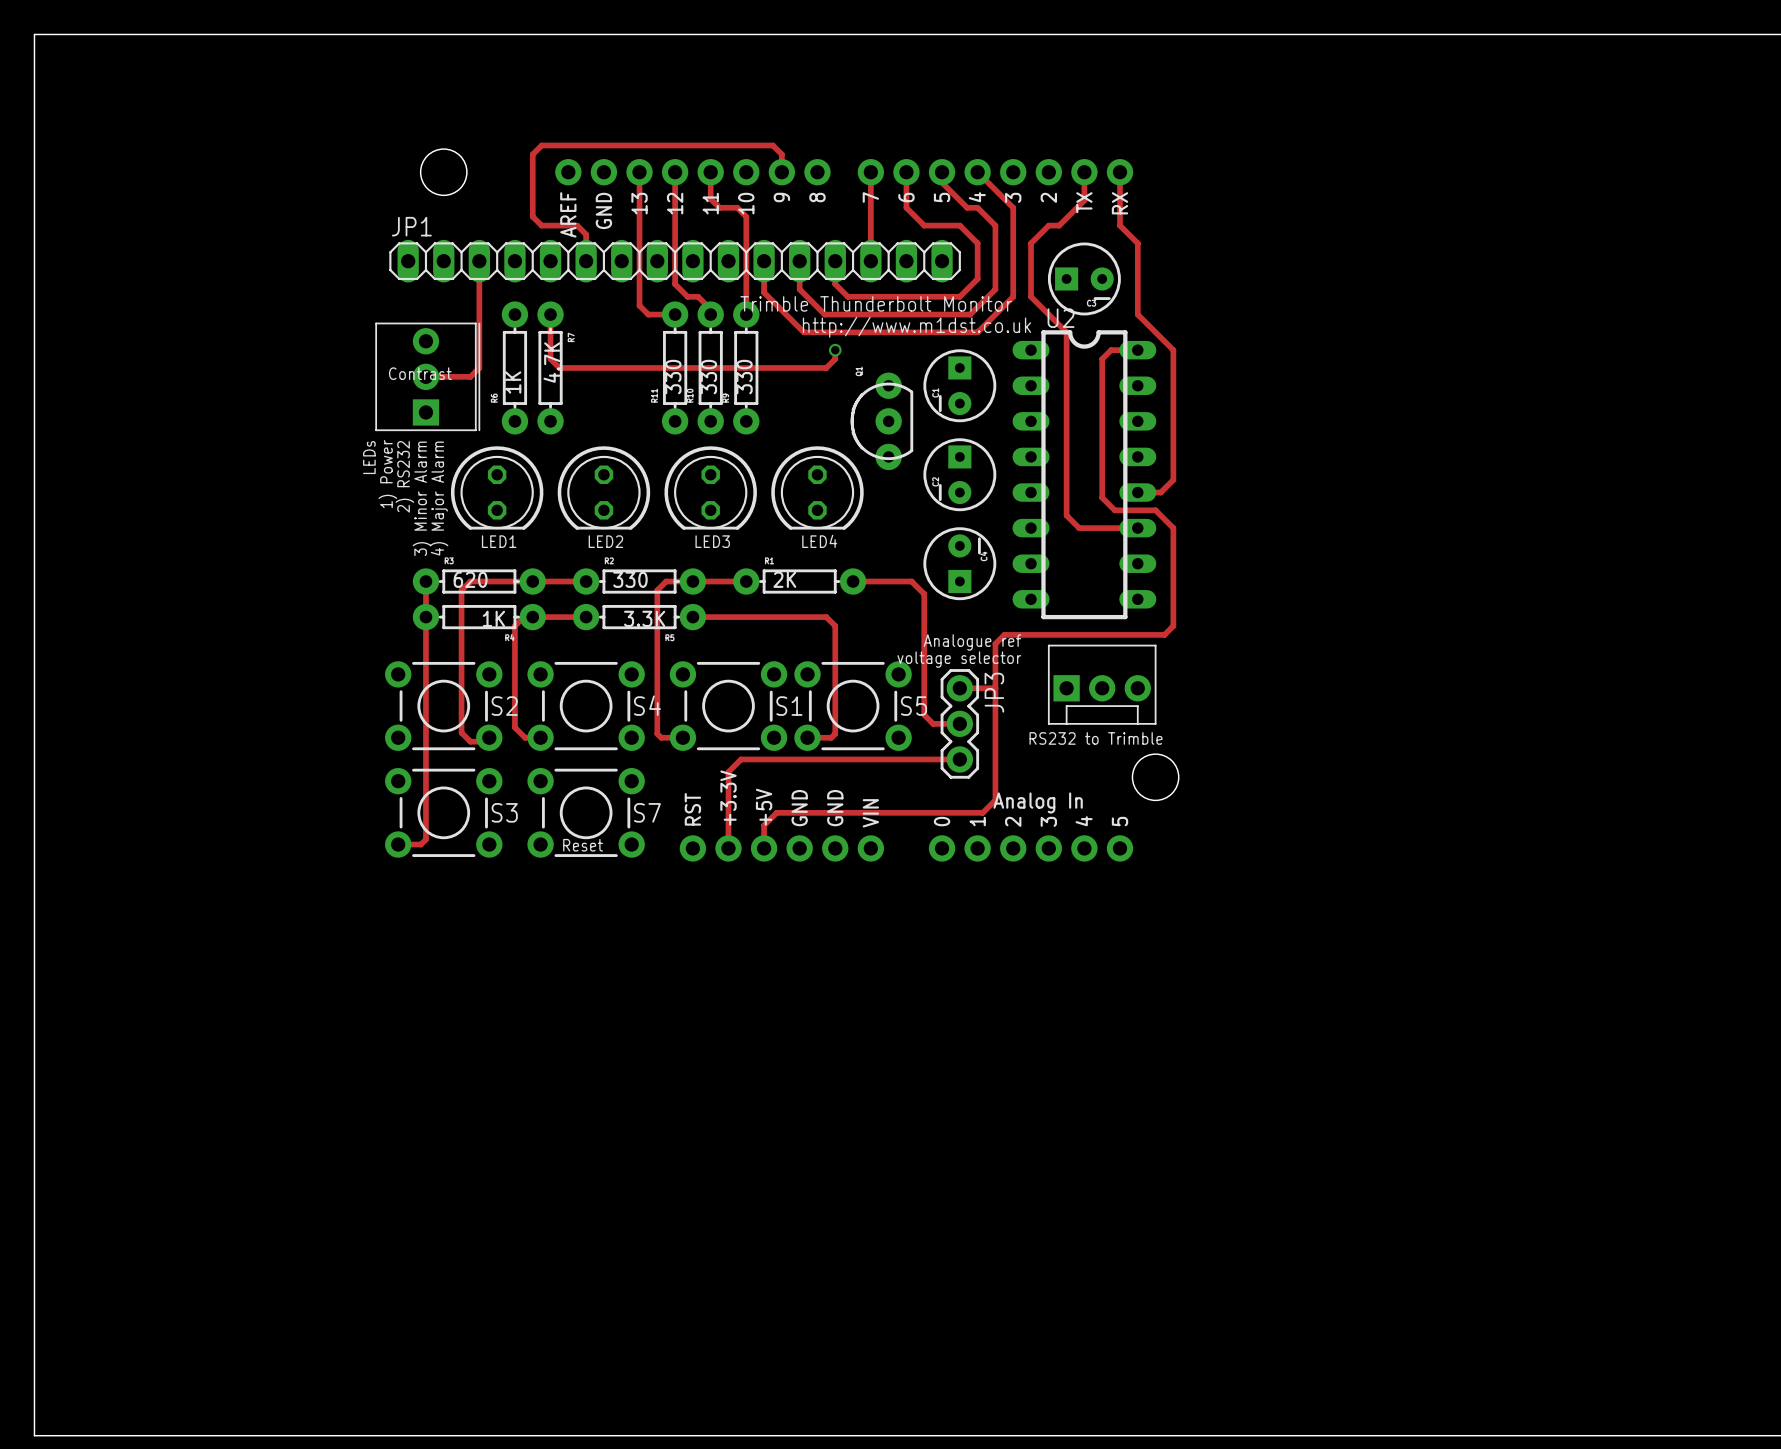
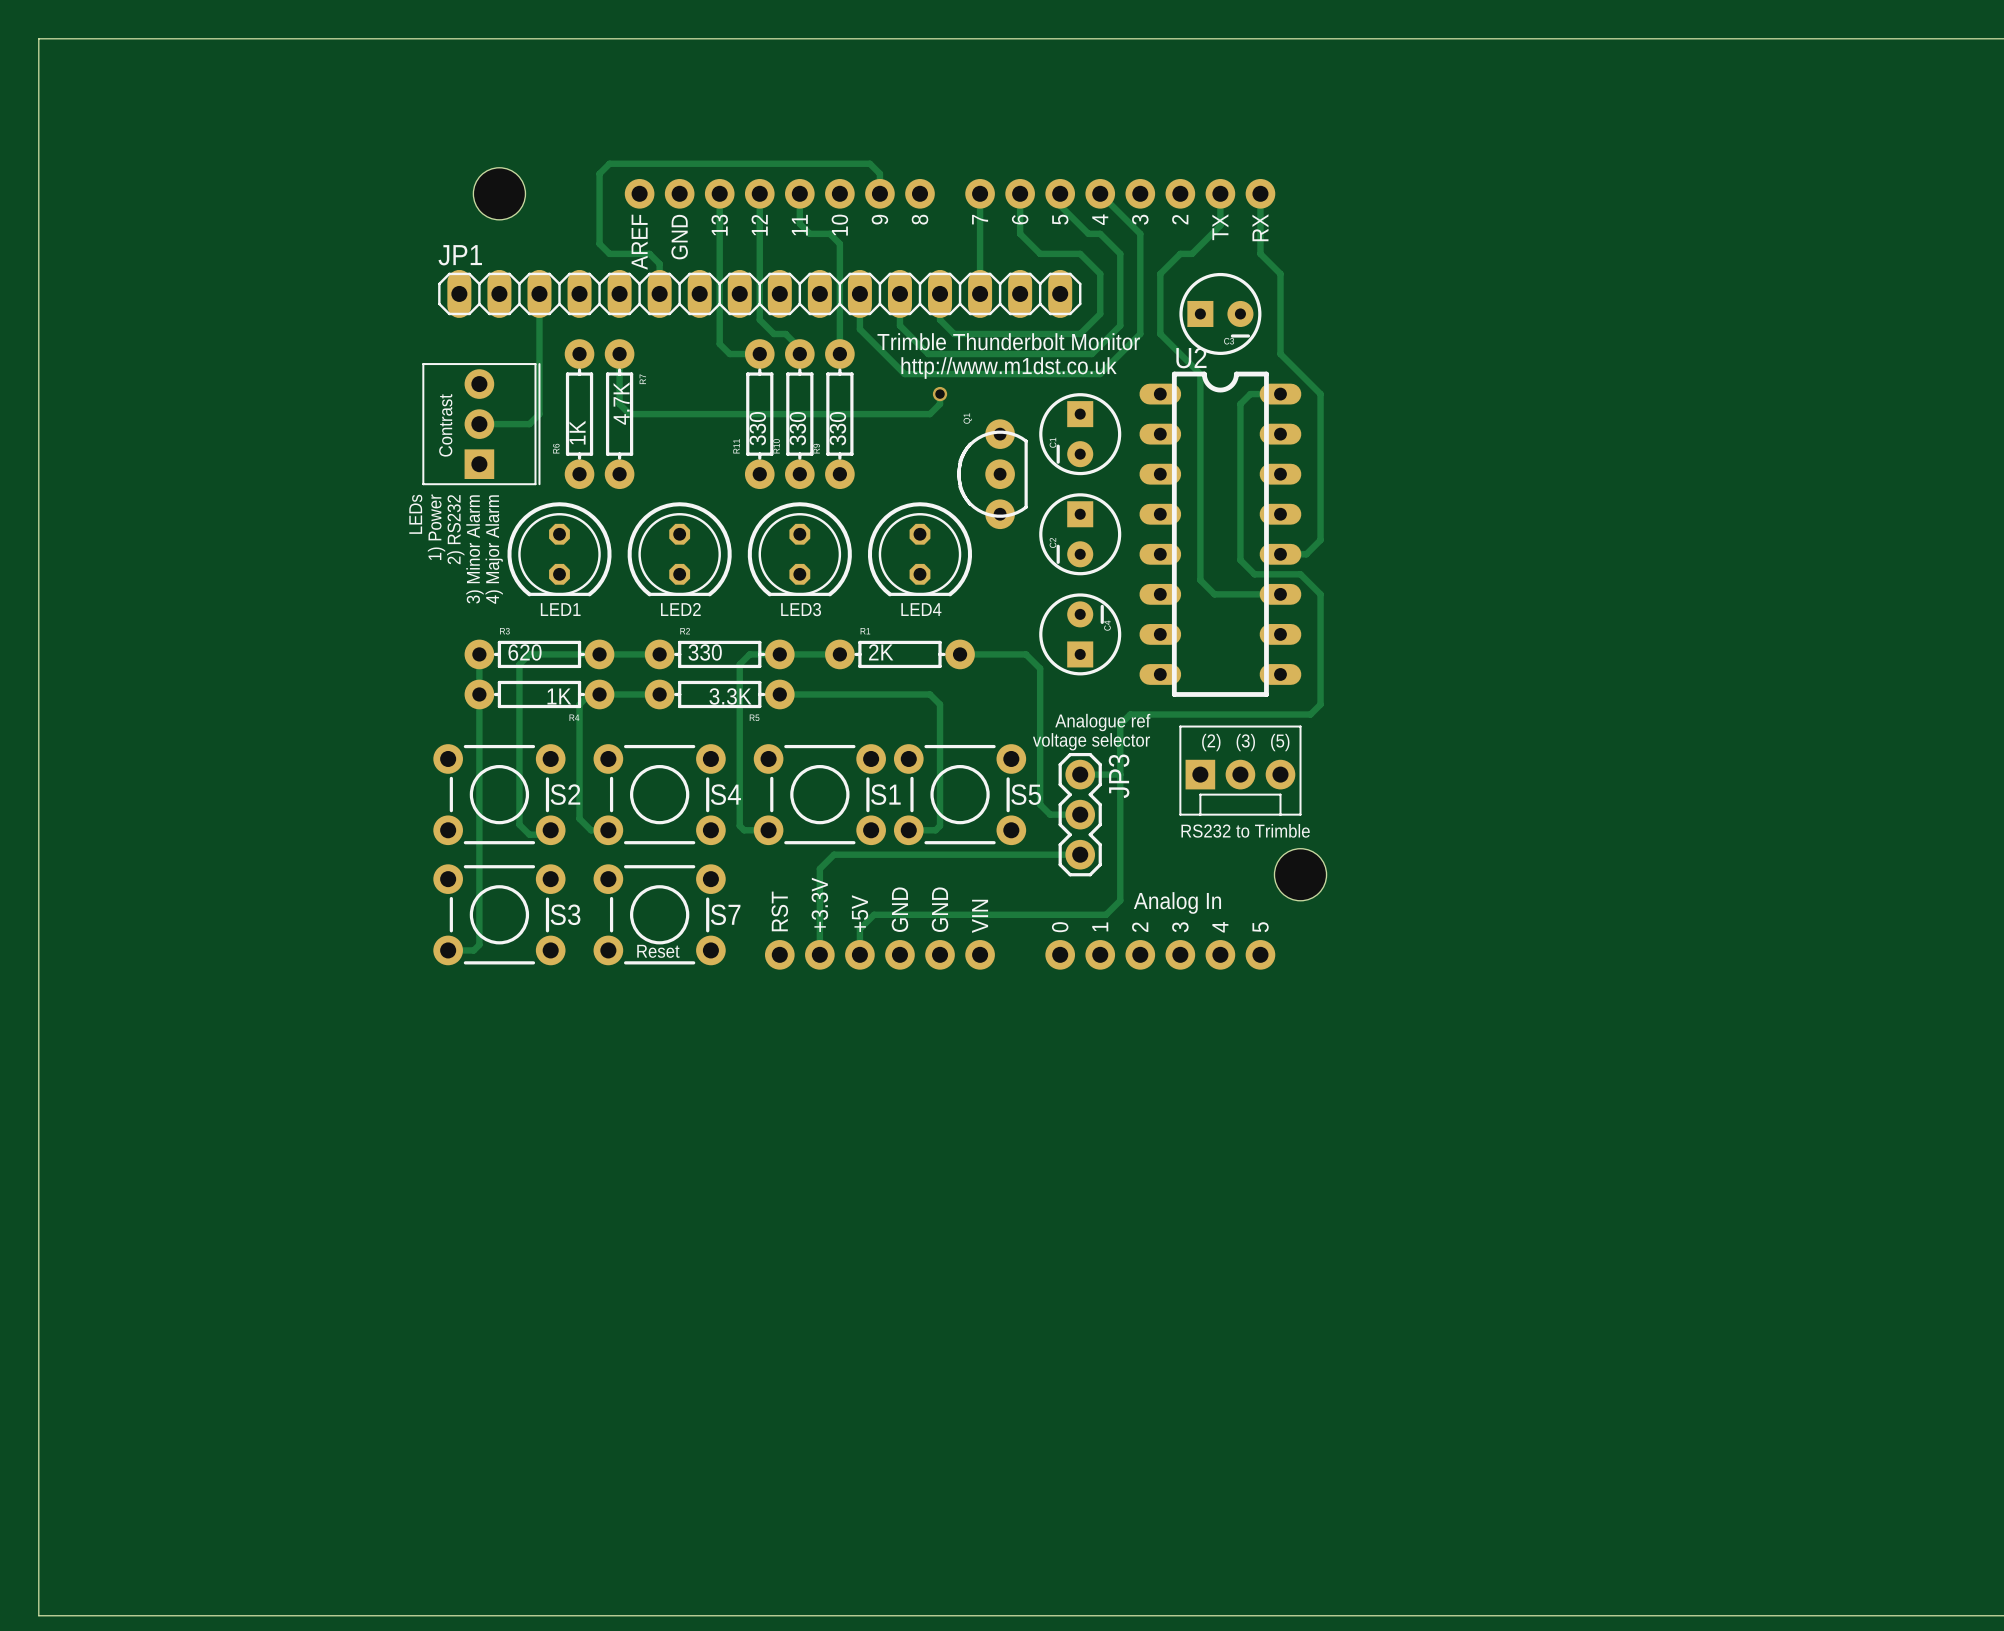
text rotation: 0° (420, 373) -> 90° counterclockwise (445, 425)
text: none -> (2) (3) (5) (1245, 742)

